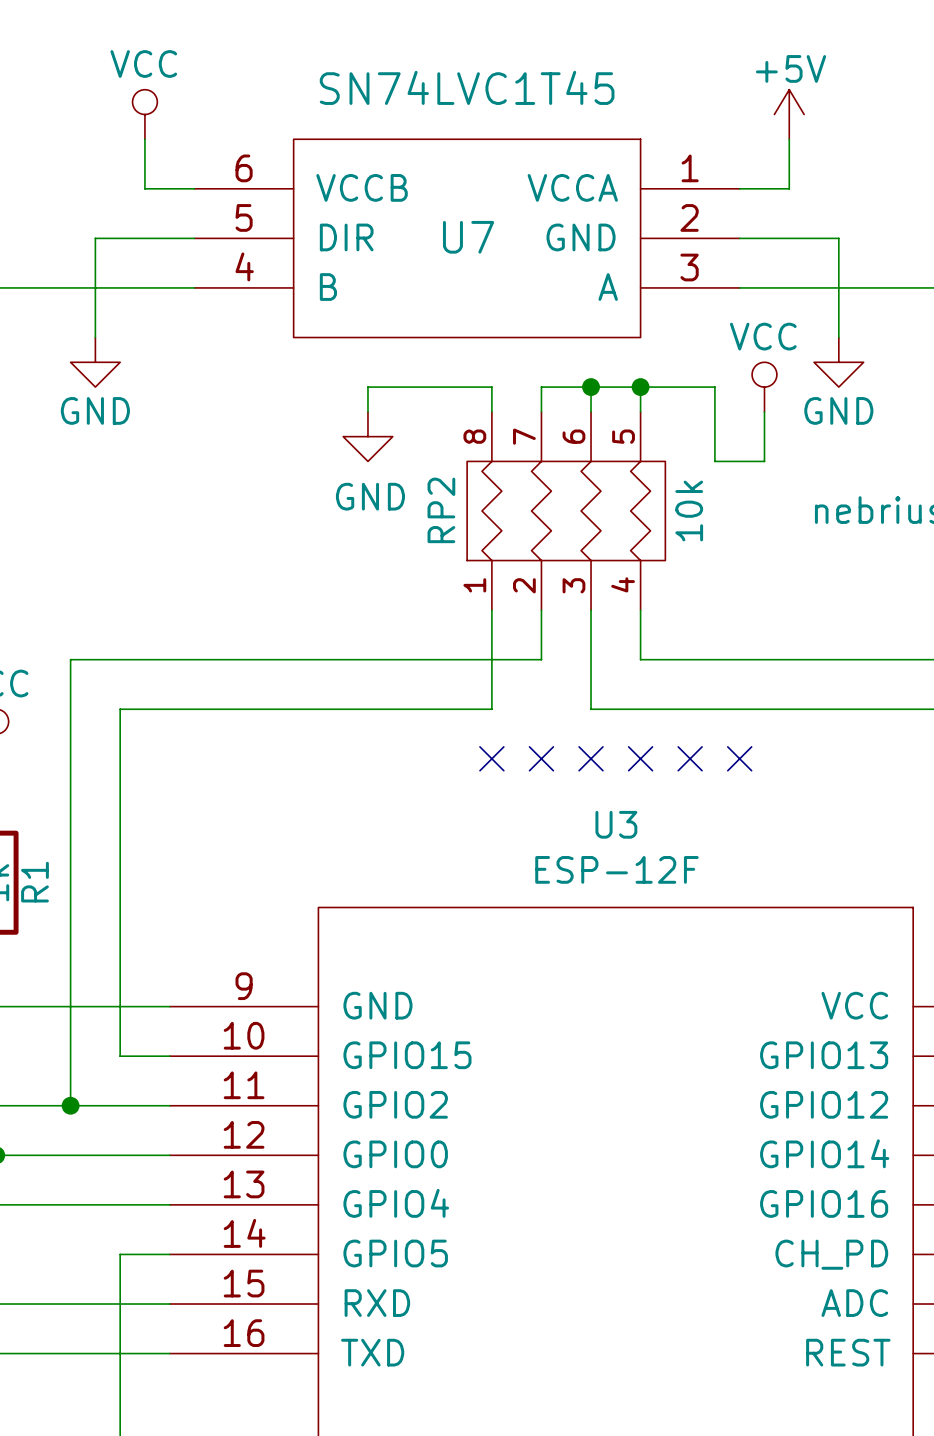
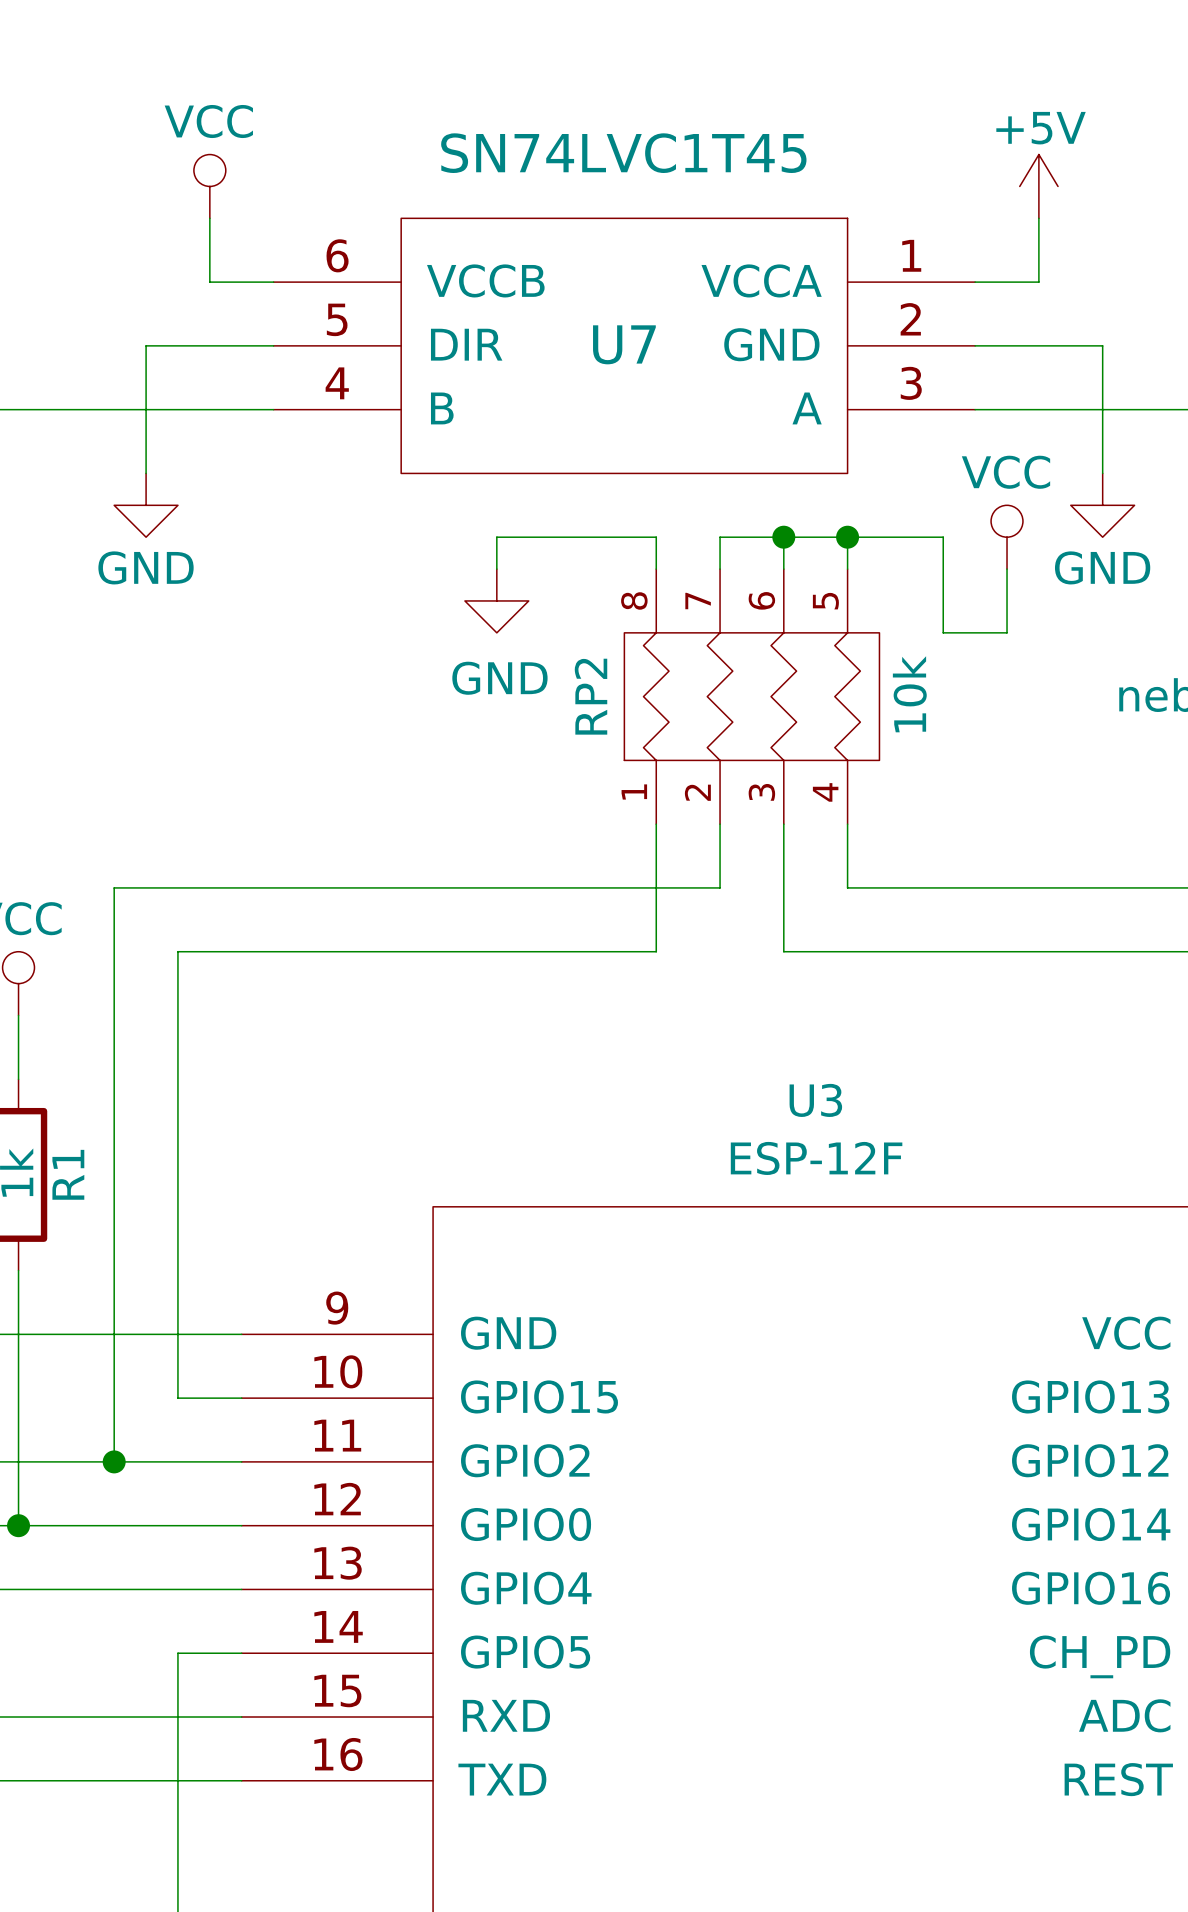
no-connect mark: (491, 758) -> none
no-connect mark: (541, 758) -> none
no-connect mark: (591, 758) -> none
no-connect mark: (640, 758) -> none
no-connect mark: (690, 758) -> none
no-connect mark: (739, 758) -> none

